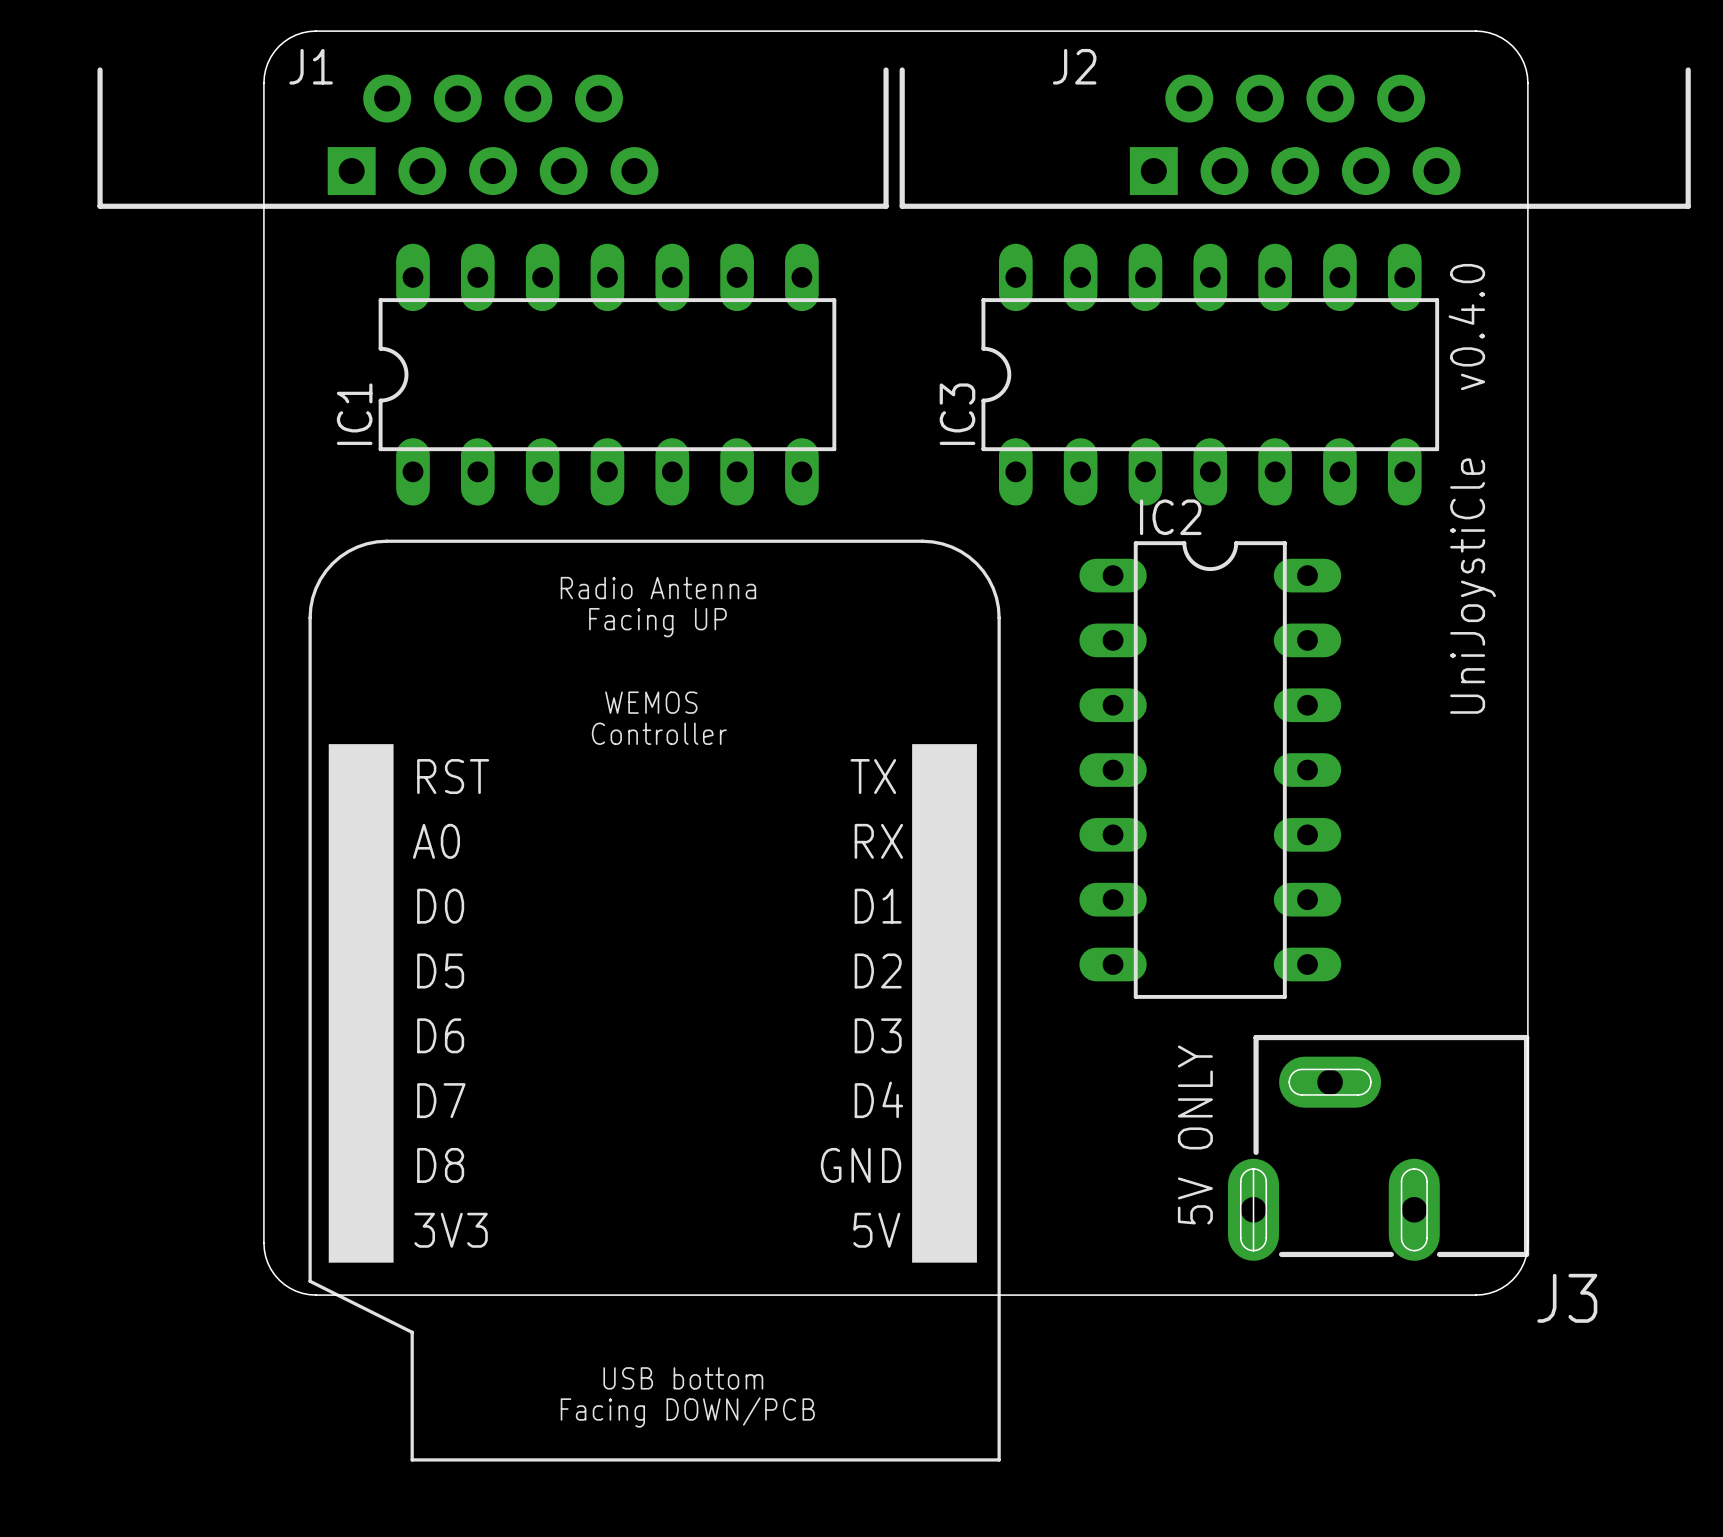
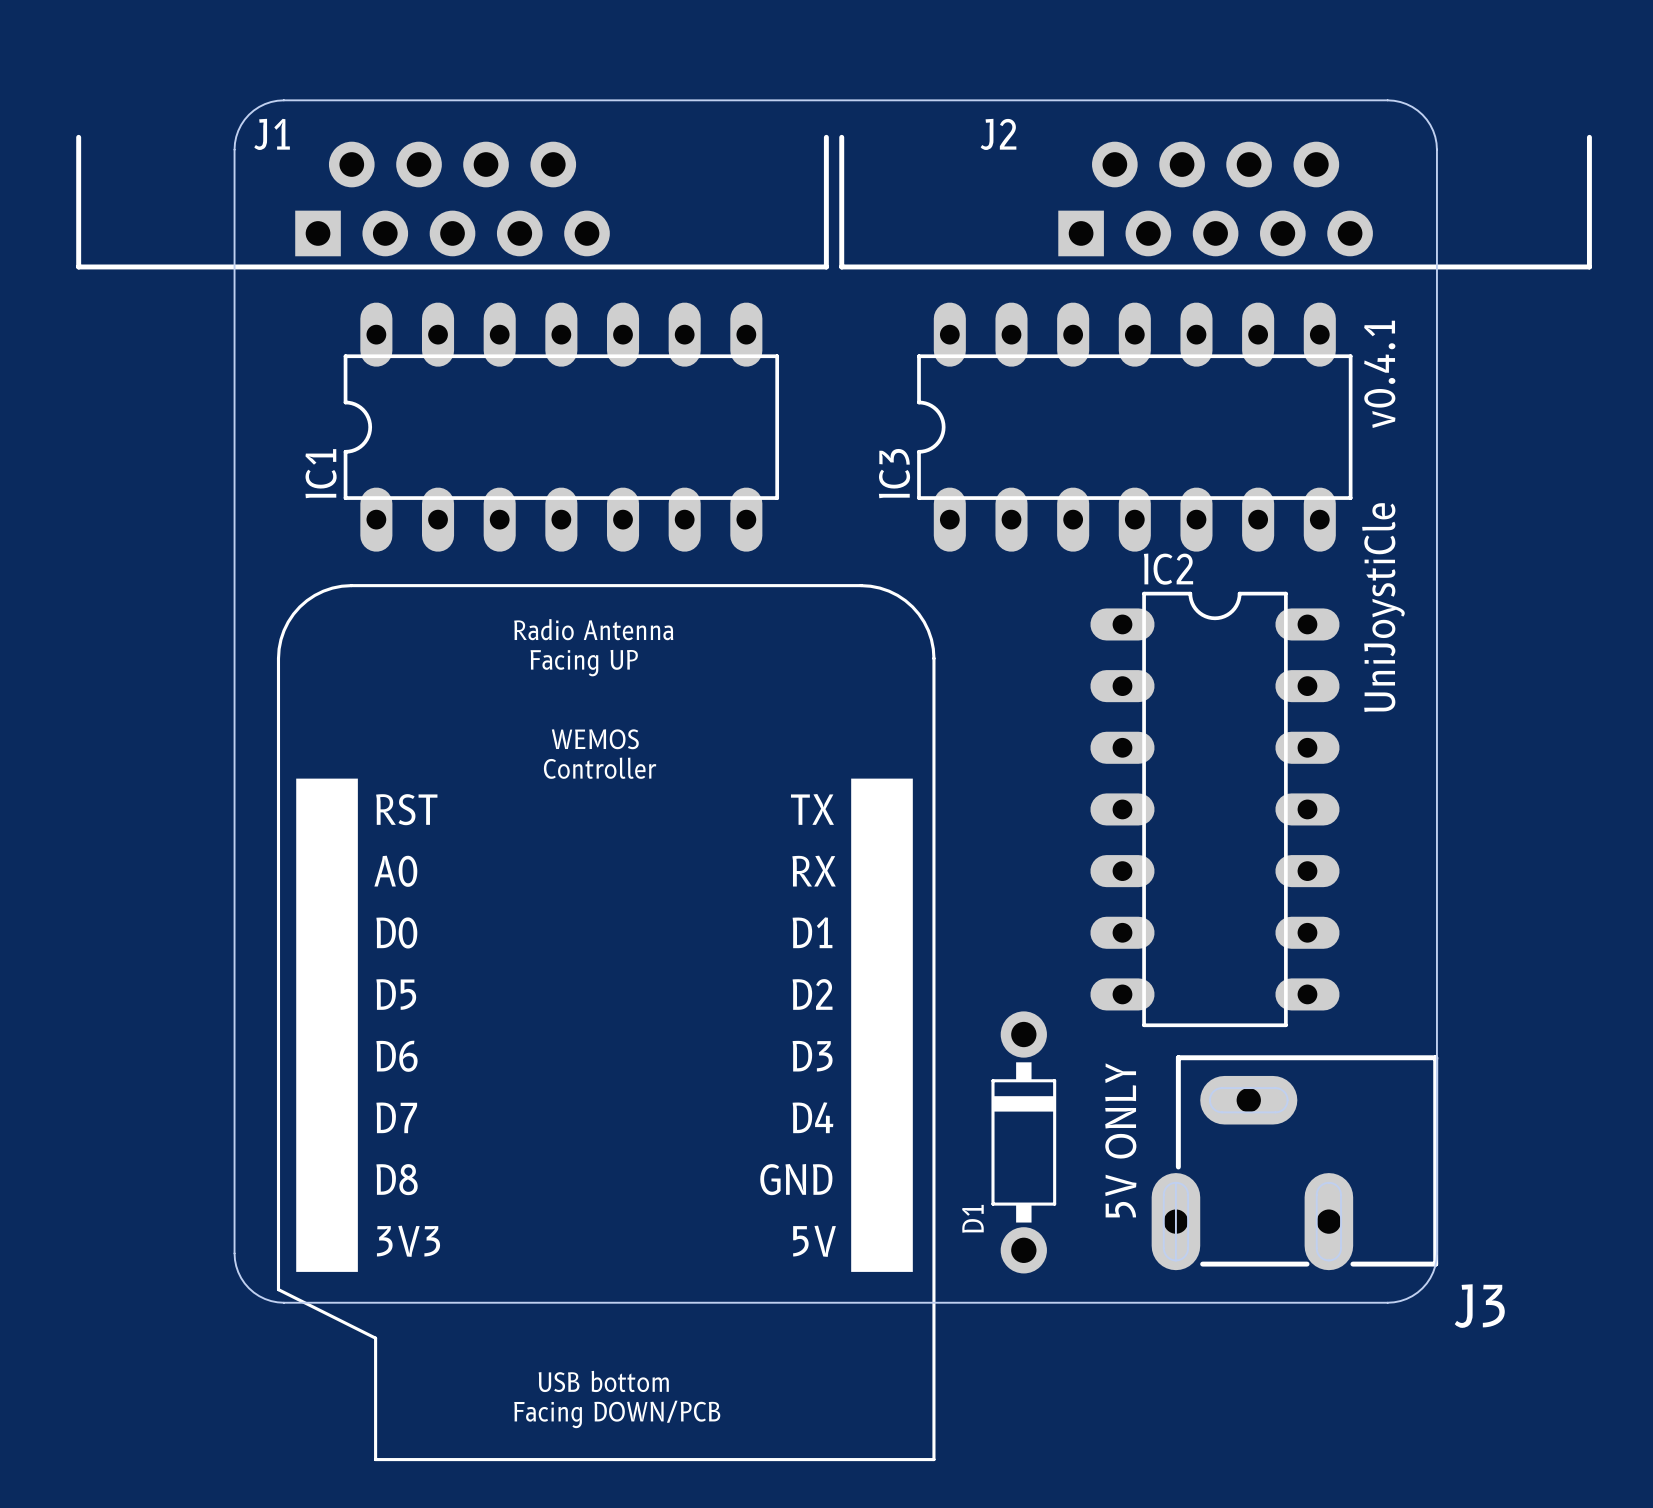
text: v0.4.0 (1466, 327) -> v0.4.1 (1379, 374)
IC2 position: (1210, 770) -> (1214, 809)
D1: none -> (1023, 1142)

